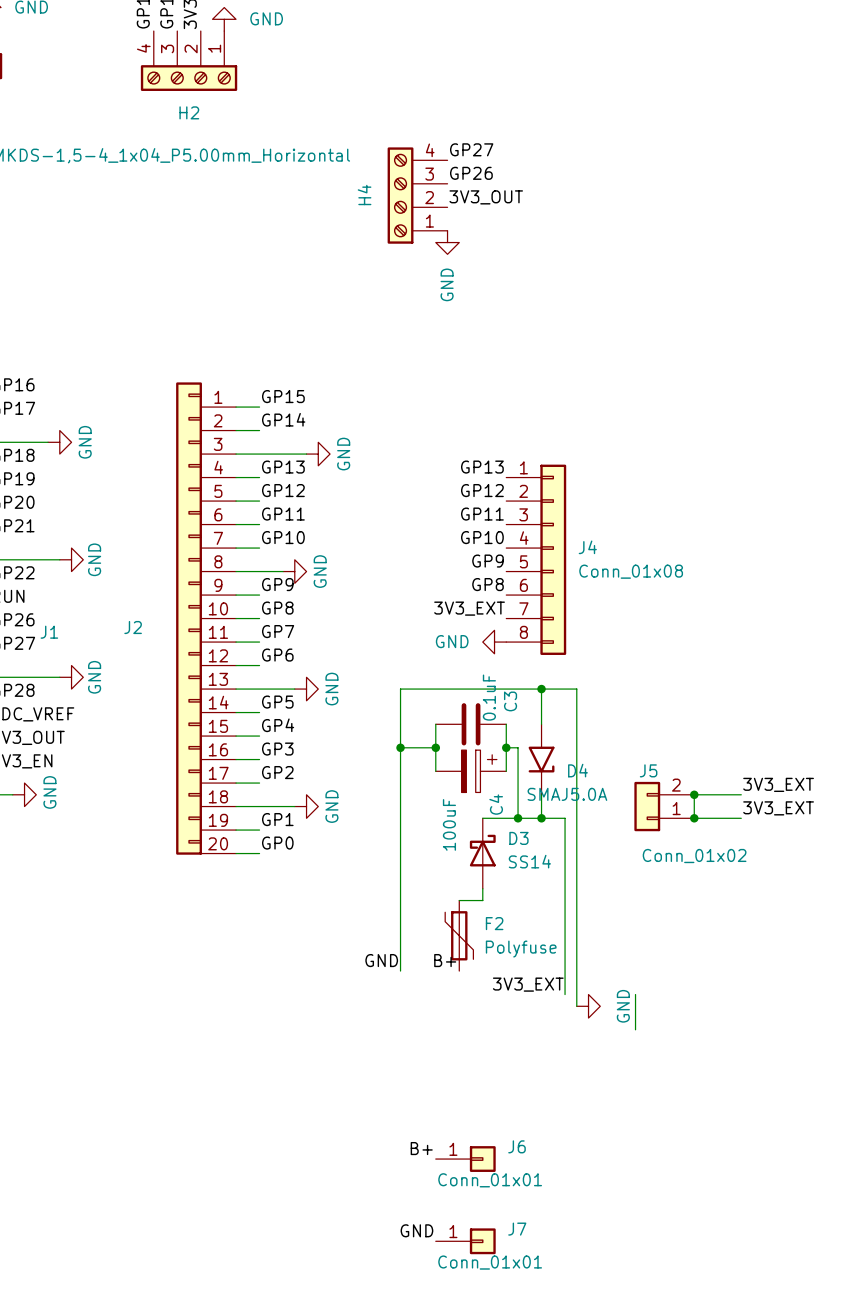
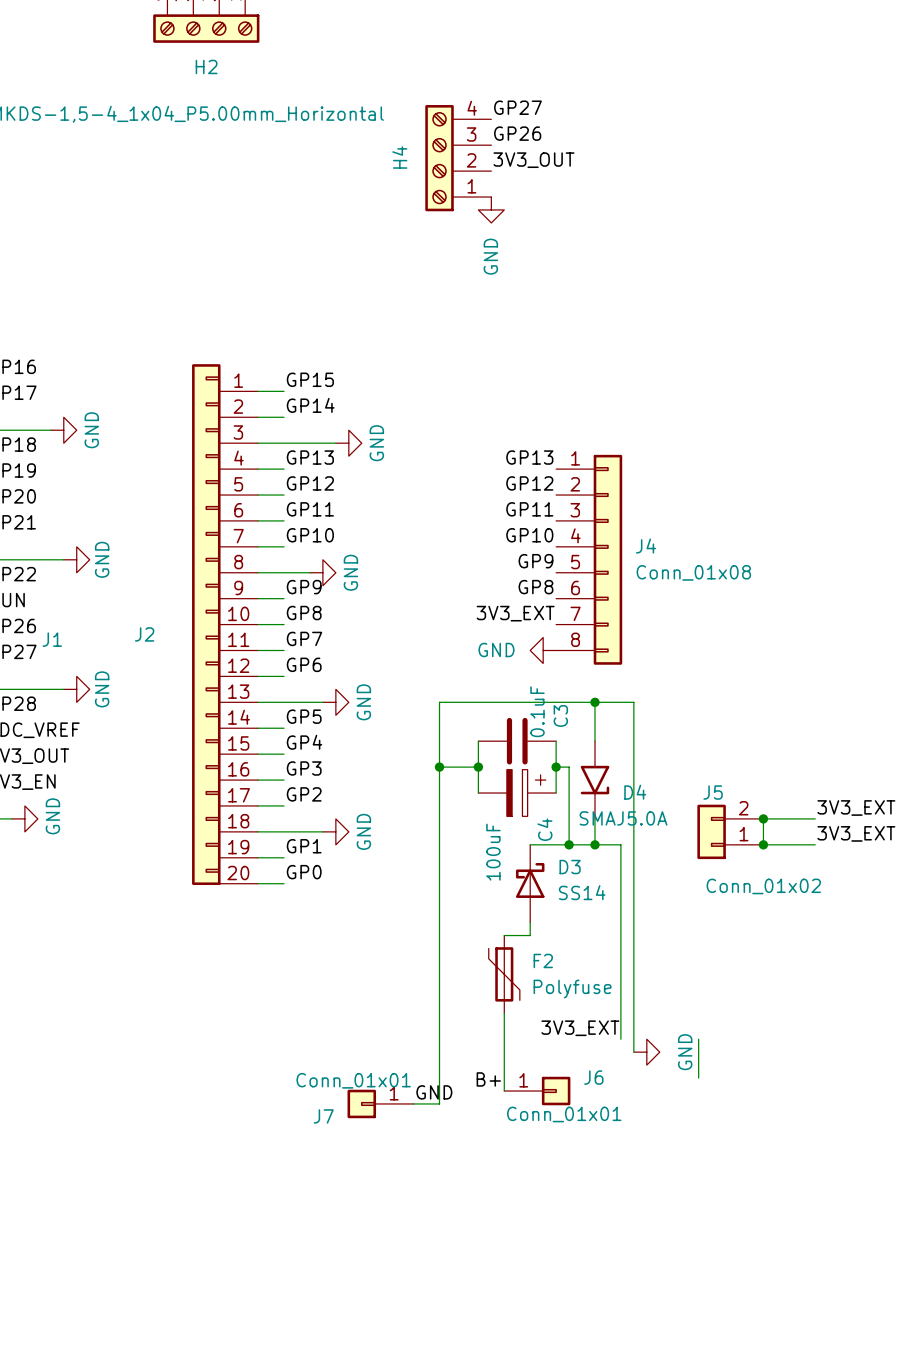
label position: GND (381, 960) -> GND (434, 1092)
label: B+ (445, 960) -> none
wire: none -> (439, 1013) (439, 1103) (413, 1103)
wire: none -> (504, 1013) (504, 1091)
label: none -> B+ (488, 1079)
label: B+ (421, 1148) -> none
J6 position: (465, 1159) -> (537, 1091)
label: GND (416, 1230) -> none
J7 position: (465, 1241) -> (380, 1103)
J7 rotation: 0° (482, 1241) -> 180° (361, 1103)

